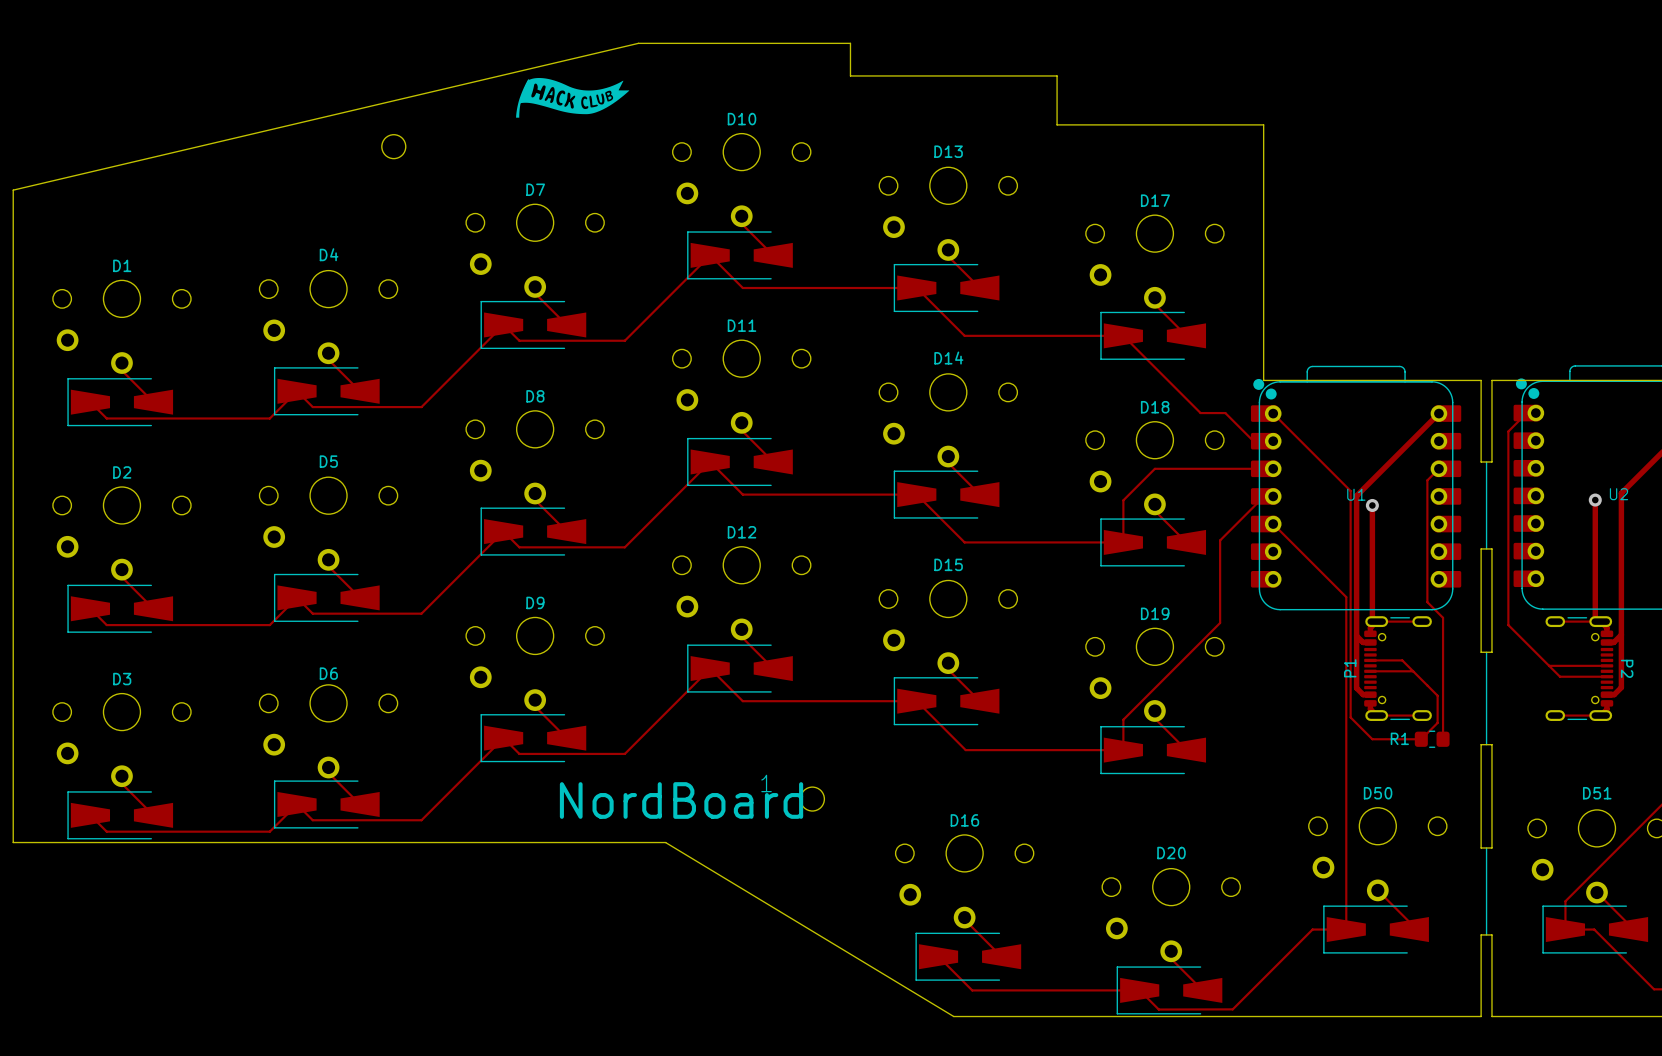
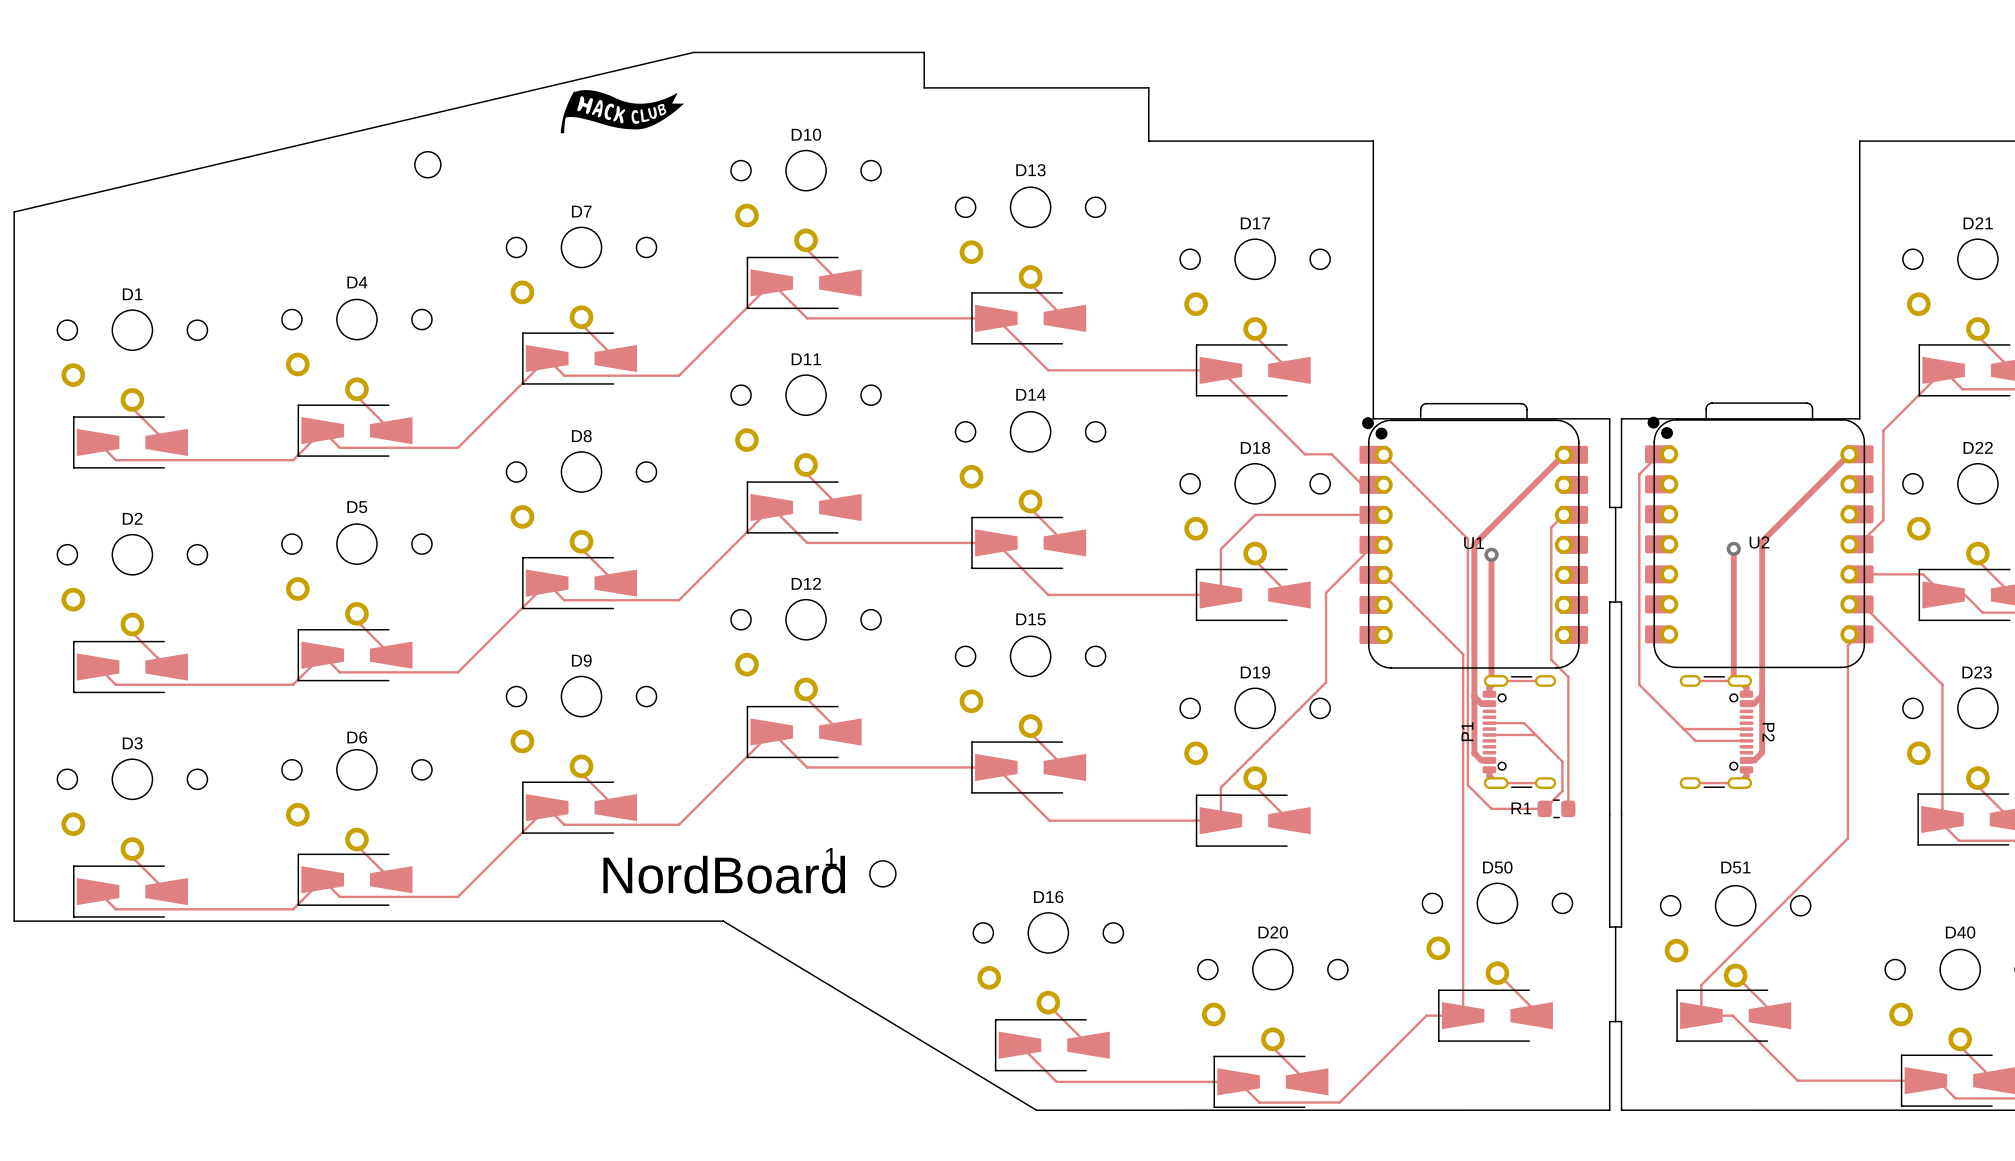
board edge: (1481, 652) (1491, 652) -> (1609, 714) (1609, 814)
line: (1486, 652) (1486, 744) -> none
board edge: (1481, 744) (1491, 744) -> (1621, 714) (1621, 814)

